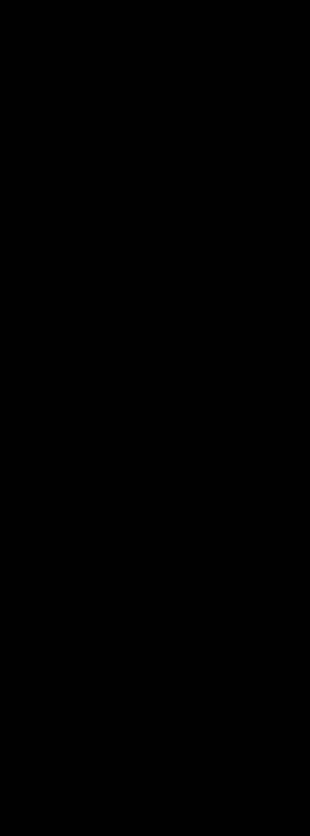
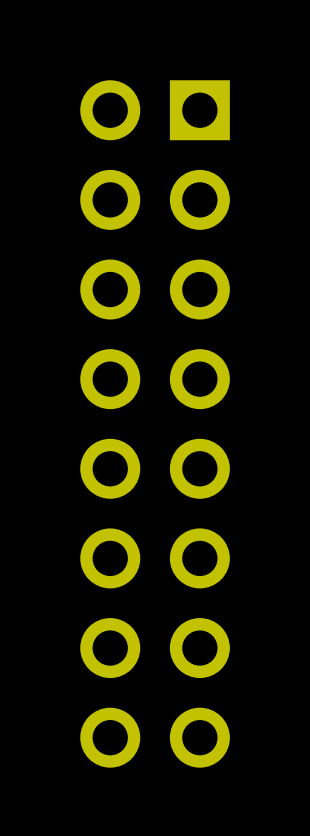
part: none -> (155, 423)

